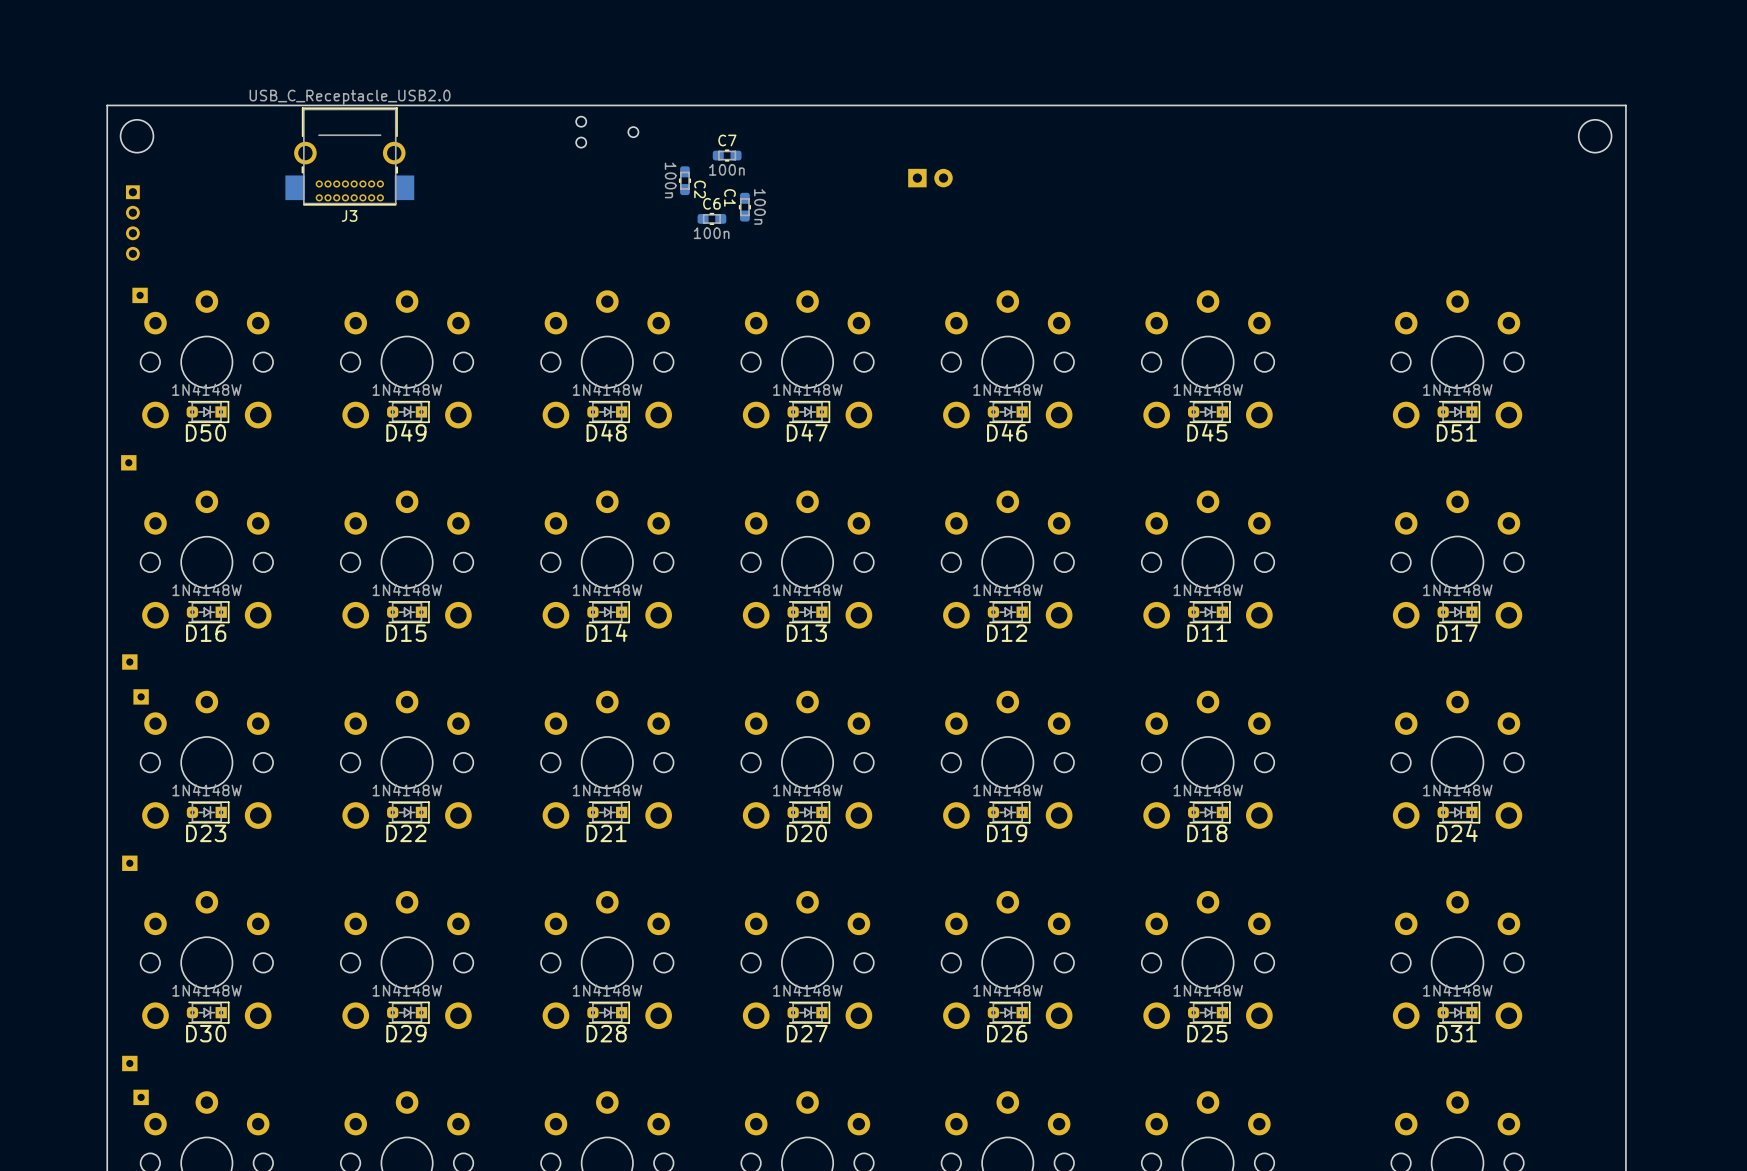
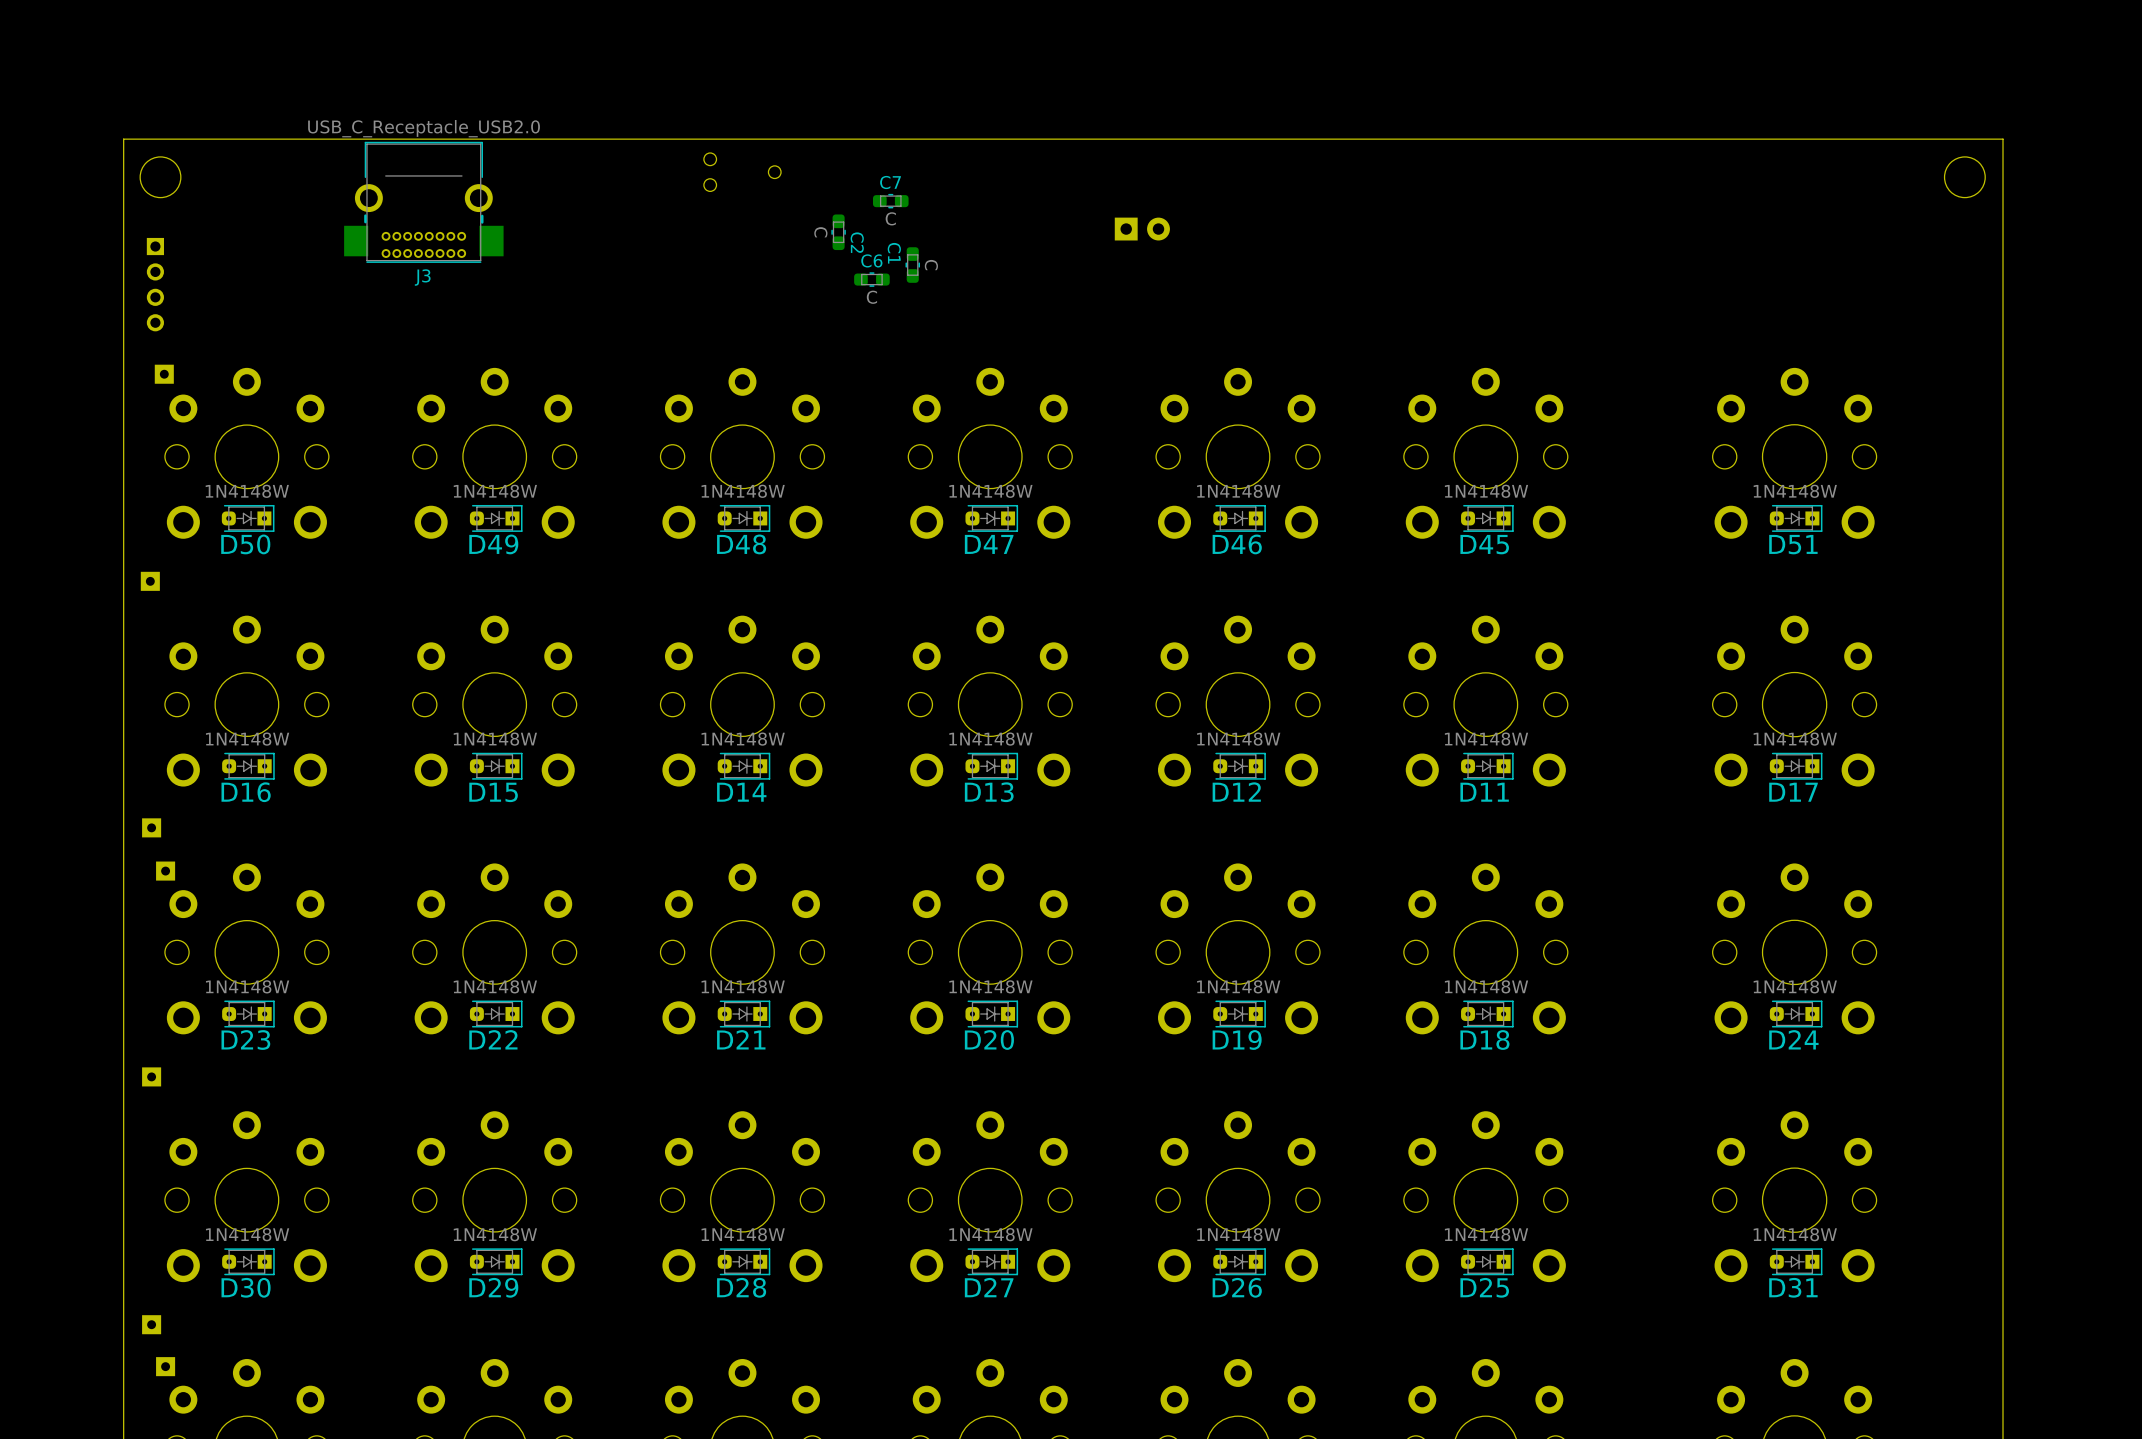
C7 value: 100n (726, 169) -> C (890, 218)
C2 value: 100n (670, 180) -> C (820, 232)
C1 value: 100n (759, 206) -> C (931, 265)
C6 value: 100n (711, 233) -> C (871, 297)

